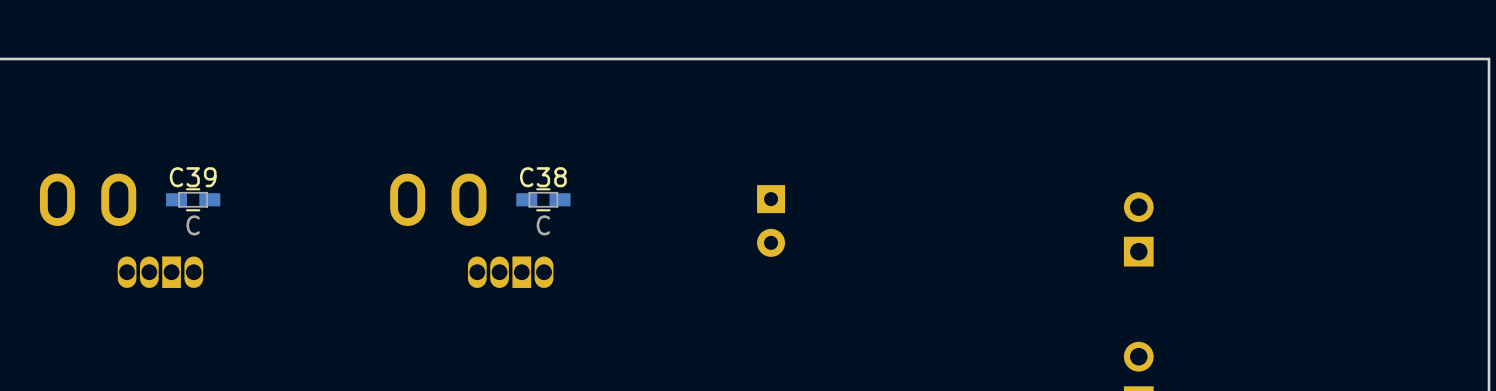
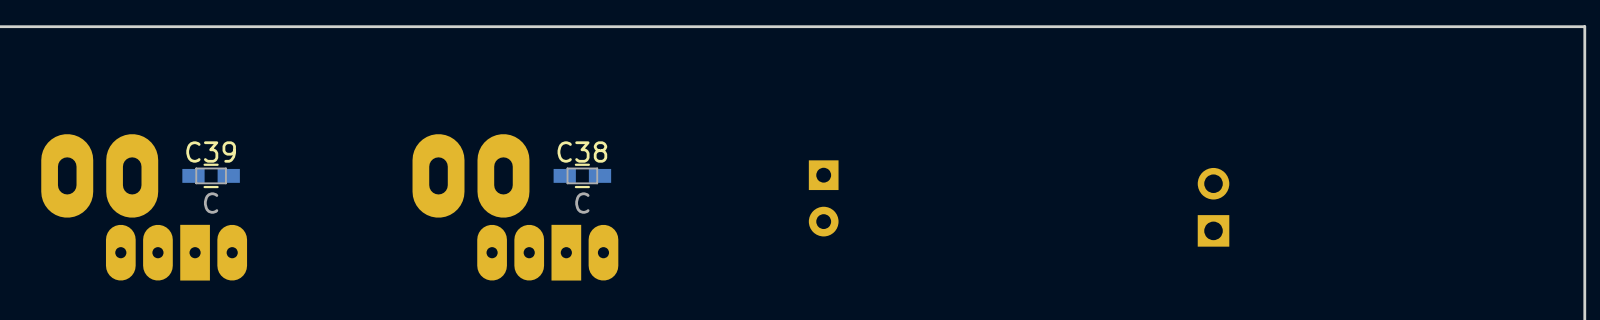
part footprint: [39, 173, 137, 227] -> [41, 134, 159, 218]
part footprint: [390, 173, 487, 227] -> [412, 134, 530, 218]
part footprint: [117, 256, 204, 288] -> [105, 224, 248, 281]
part footprint: [467, 256, 554, 288] -> [477, 224, 619, 281]

